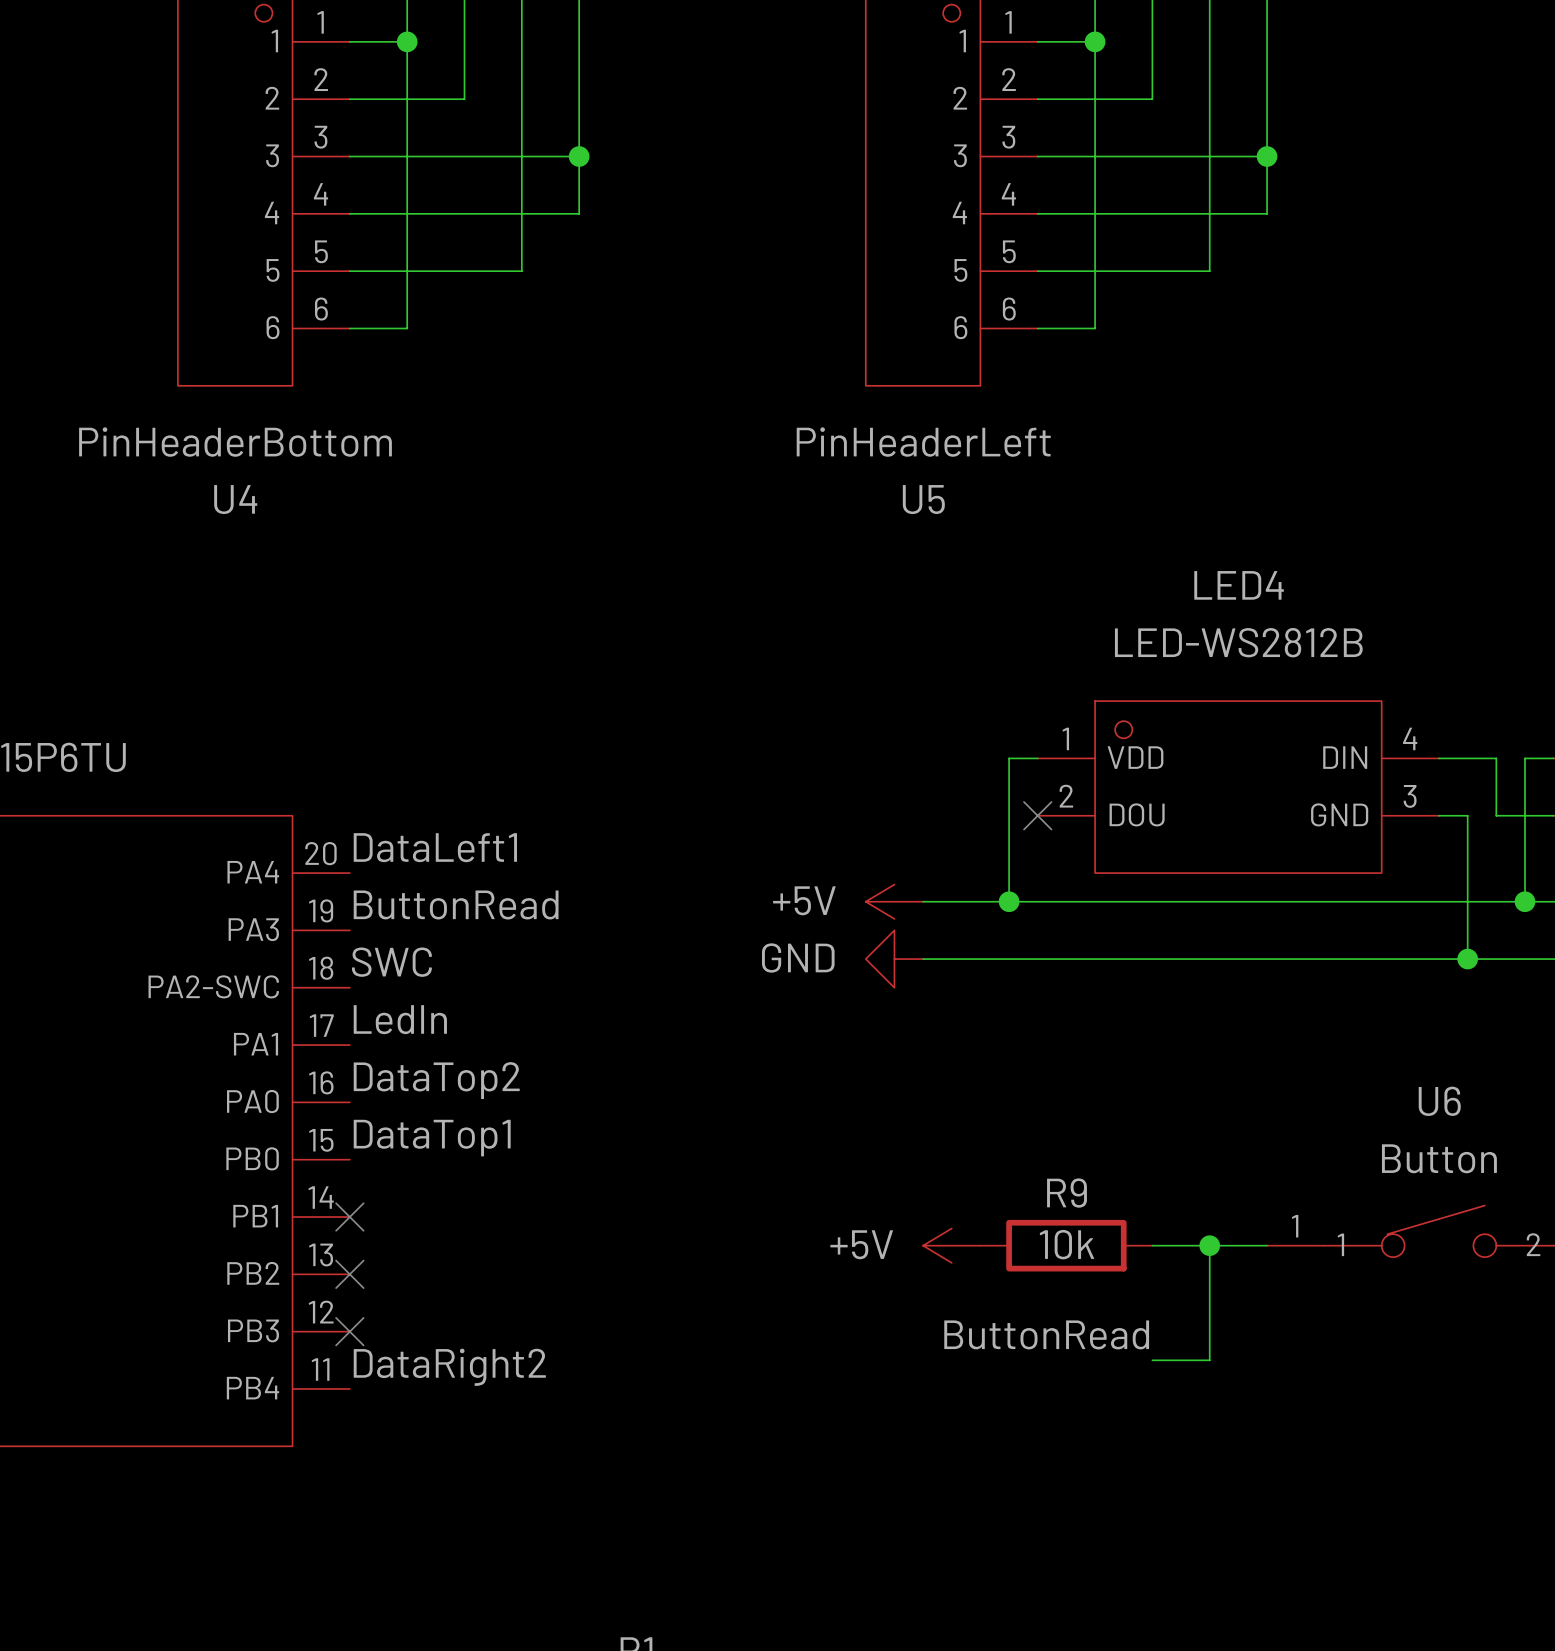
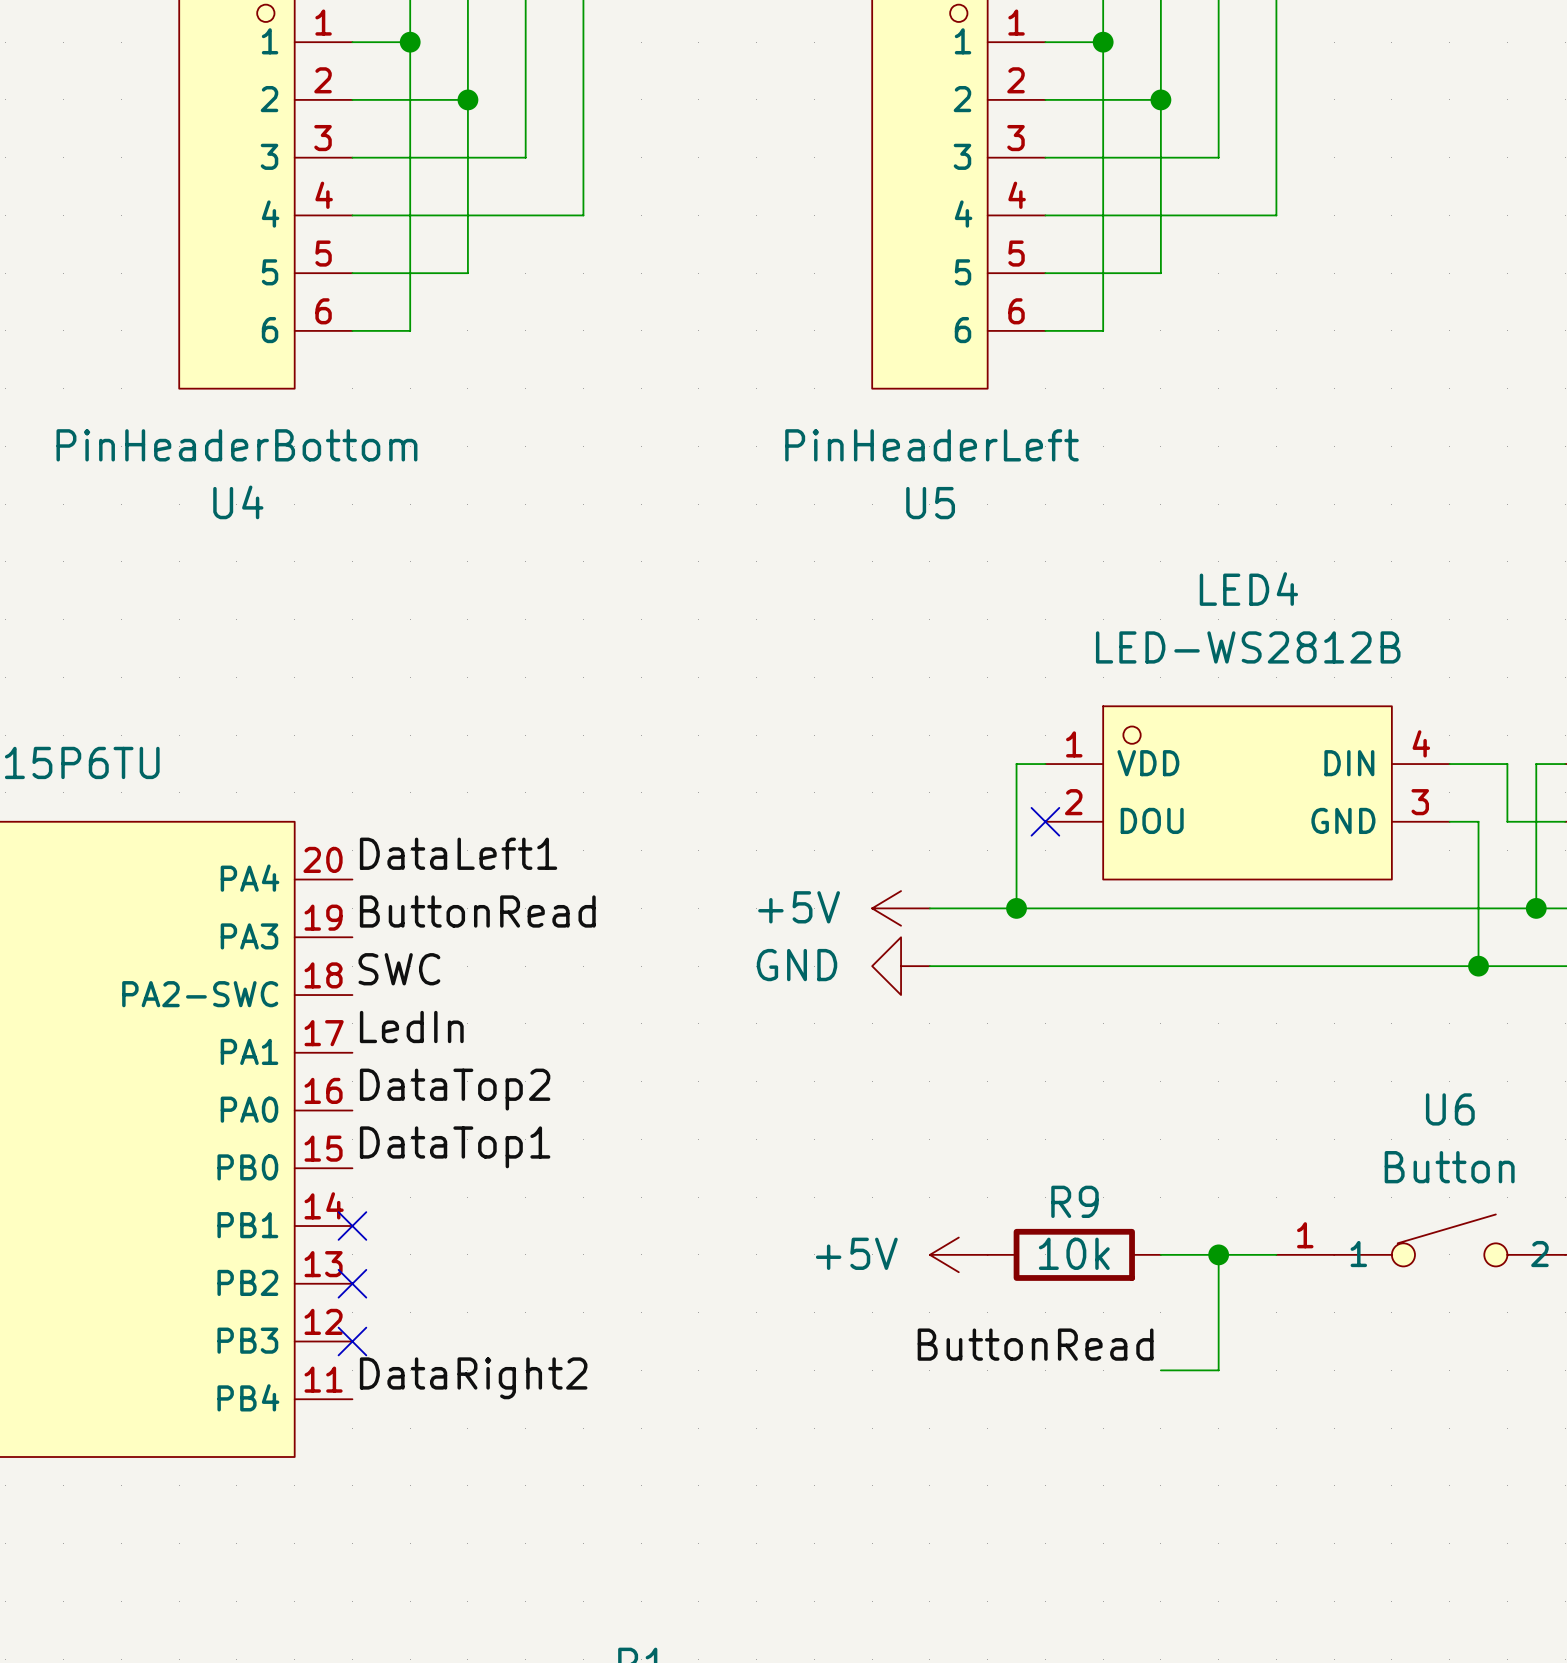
wire: (579, 156) (521, 156) (521, 271) (464, 271) -> (467, 99) (467, 273)
junction position: (579, 156) -> (467, 99)
wire: (1267, 156) (1209, 156) (1209, 271) (1152, 271) -> (1160, 99) (1160, 273)
junction position: (1267, 156) -> (1160, 99)

